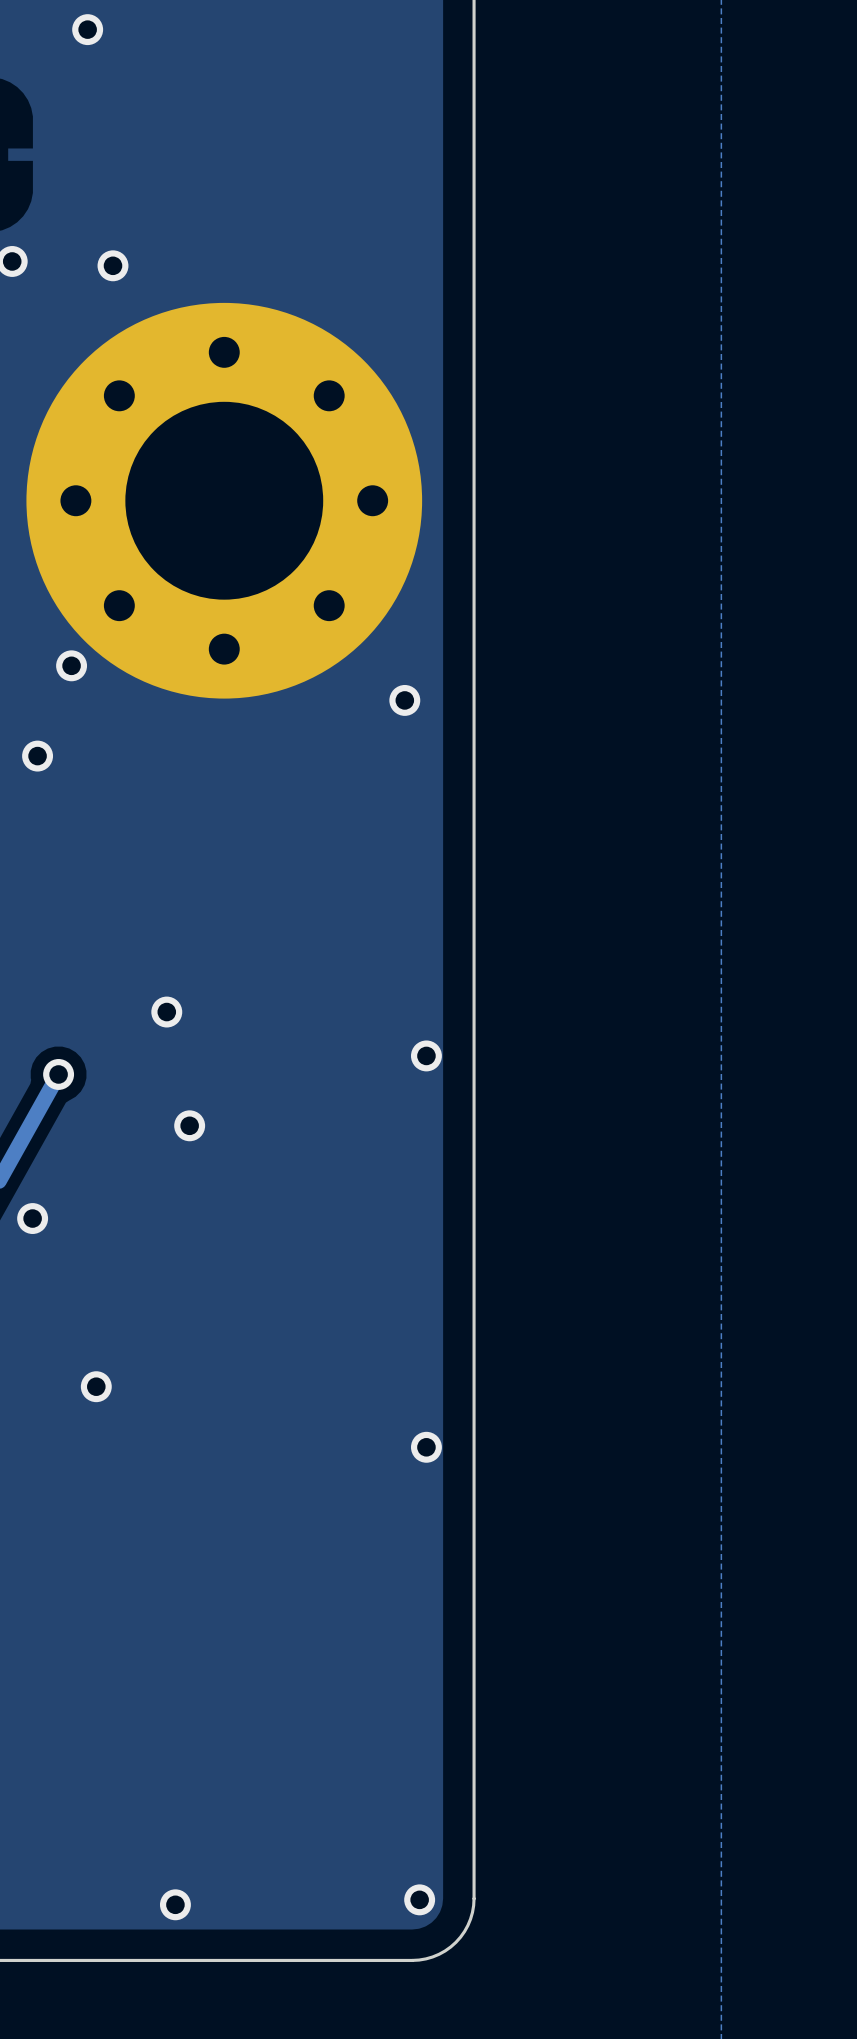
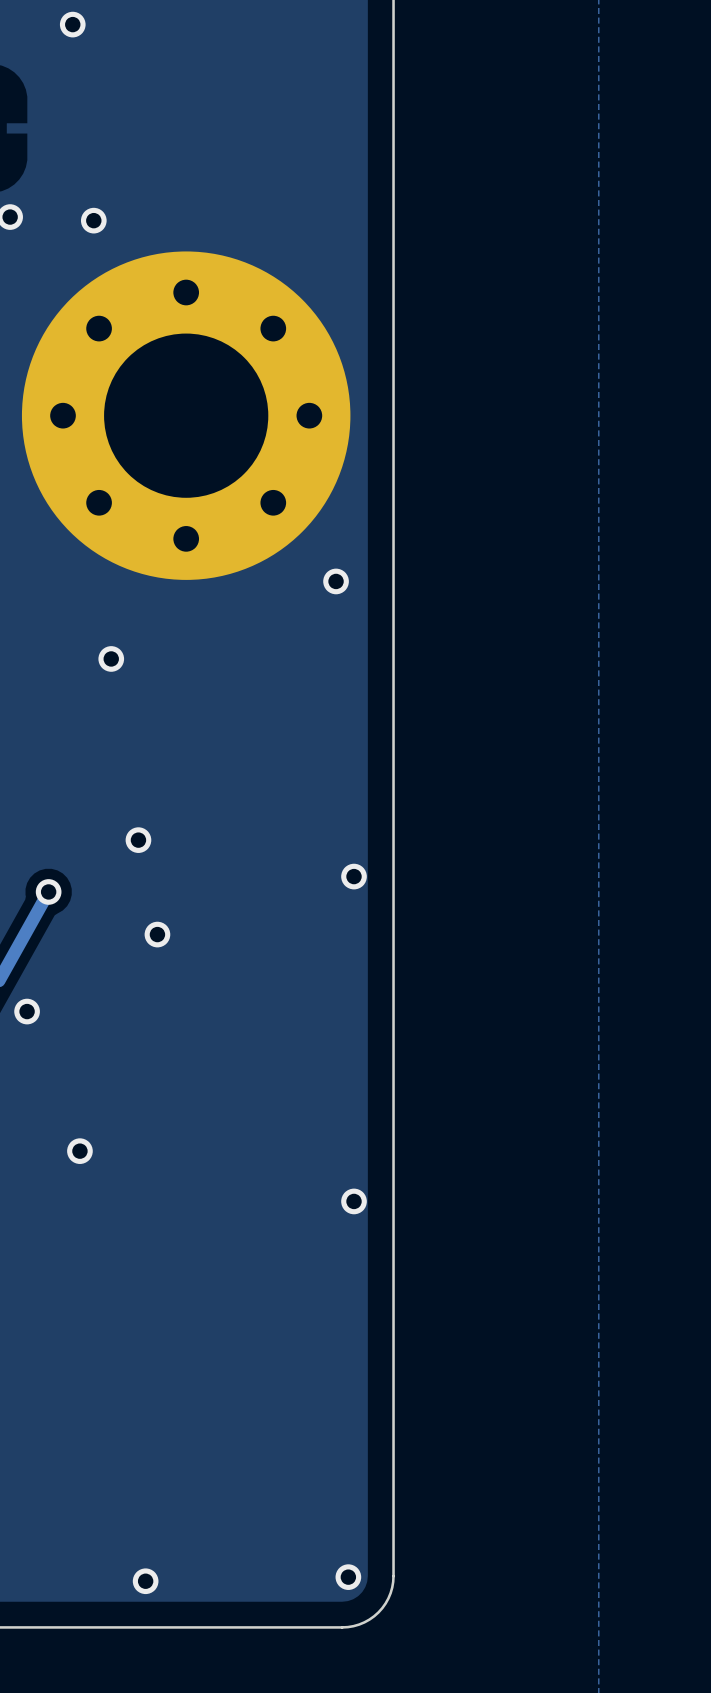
via: (71, 665) -> none
via: (37, 756) -> none
via: none -> (111, 658)

